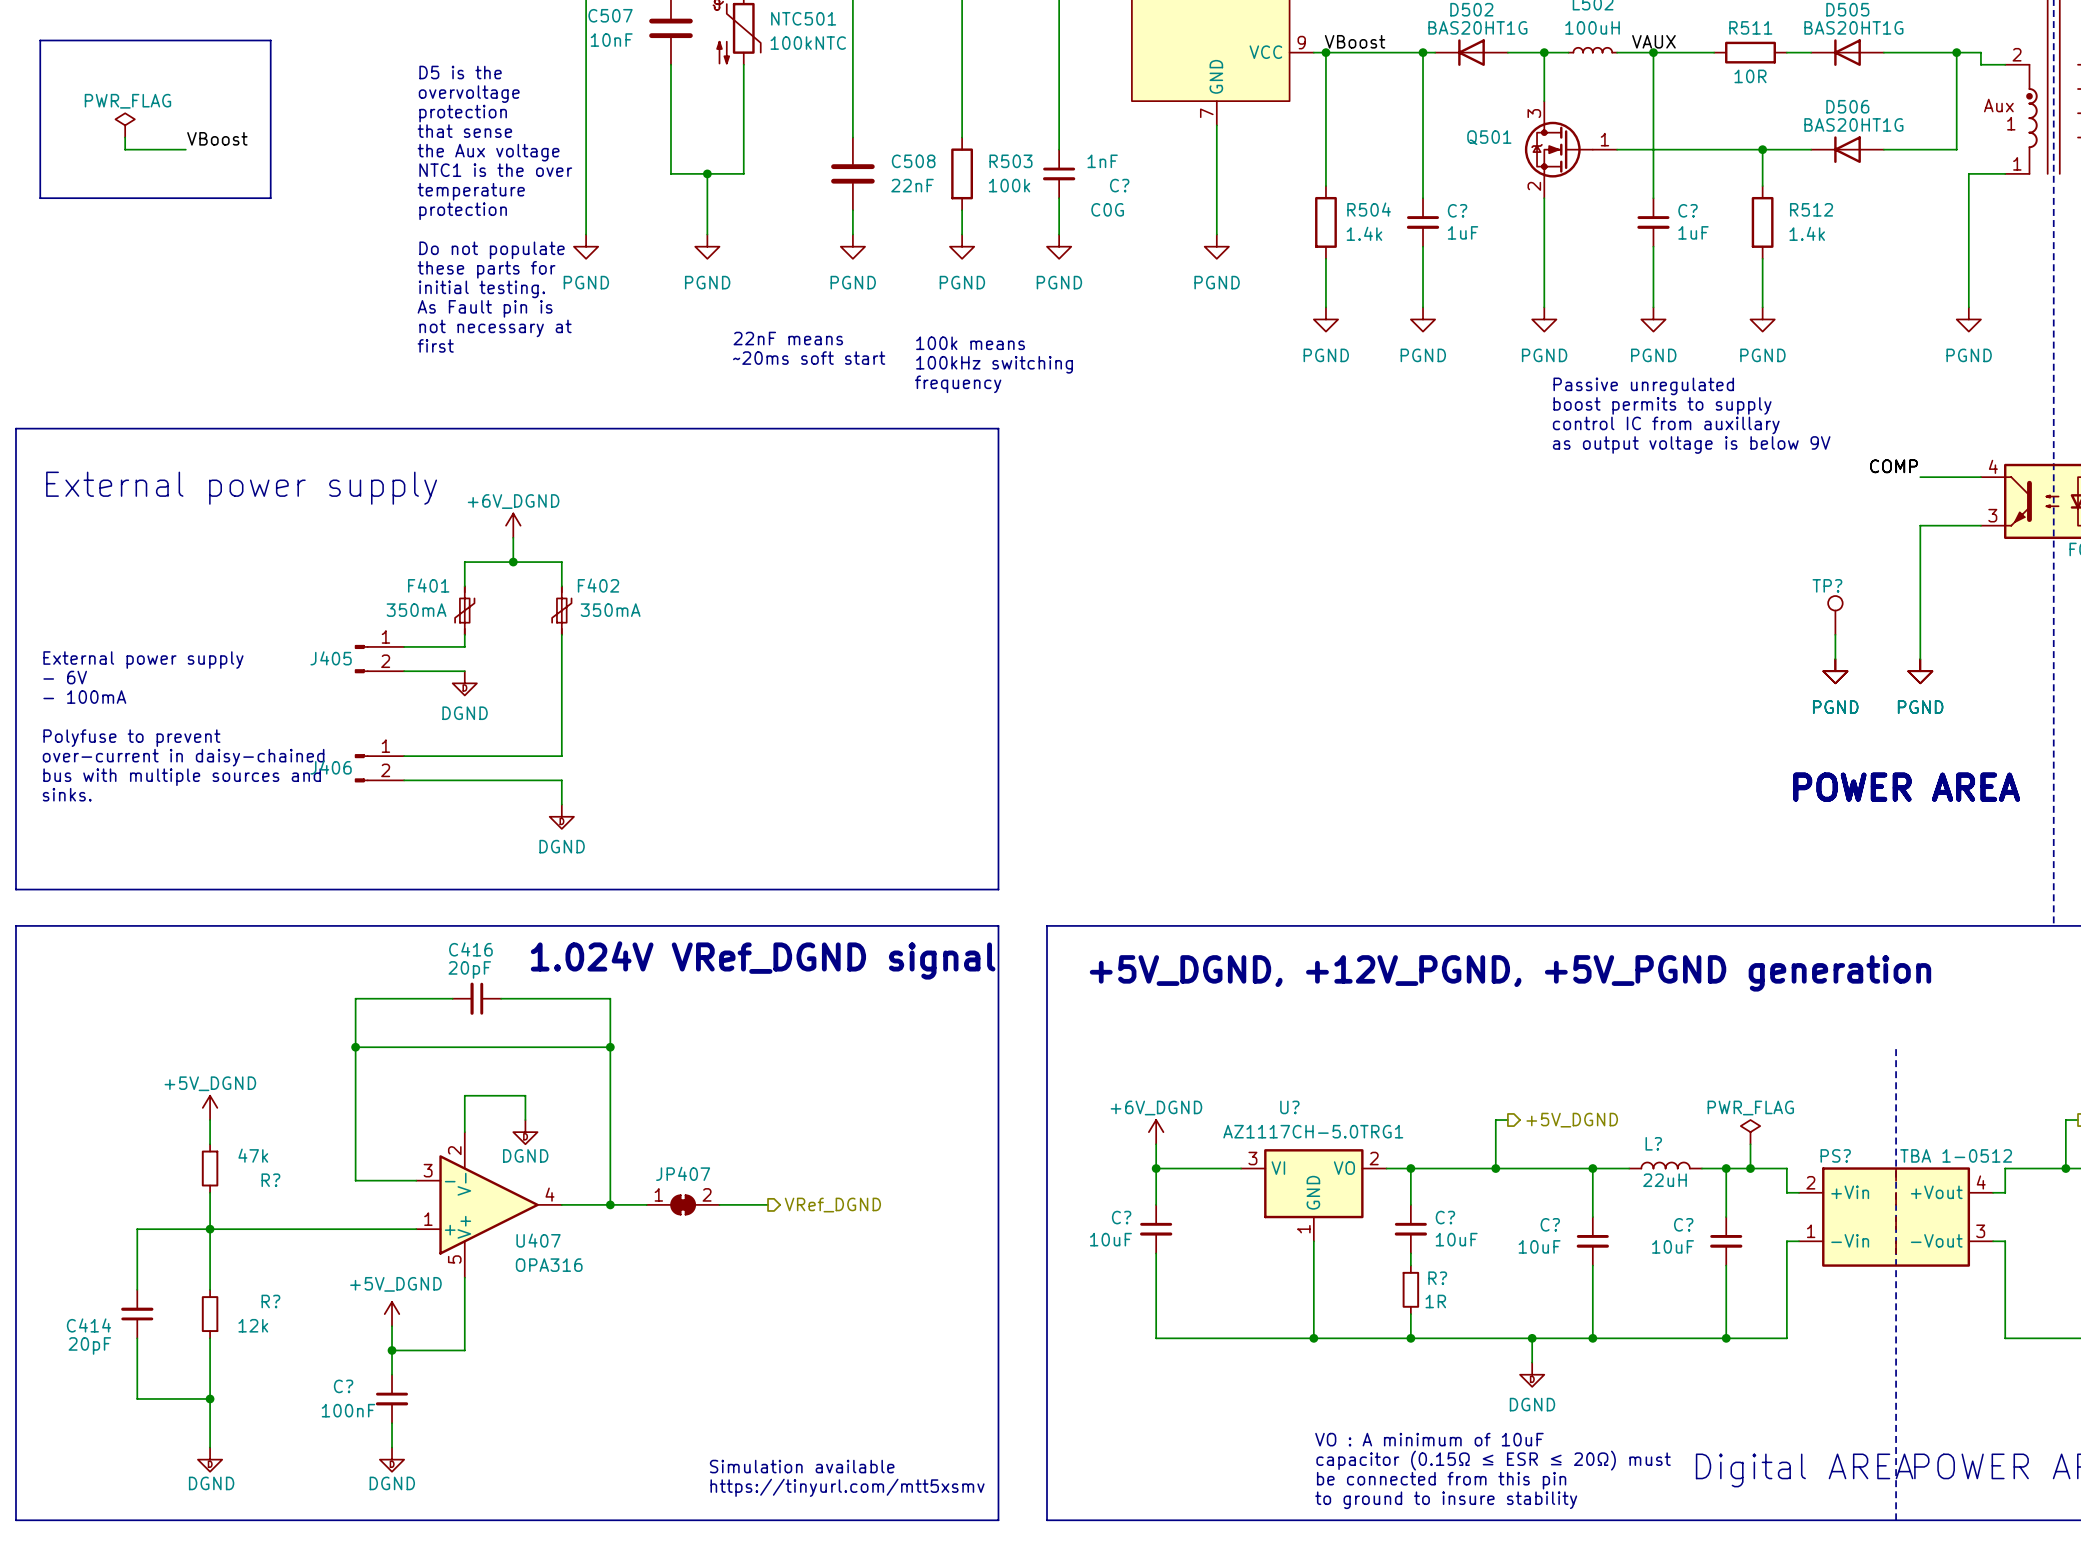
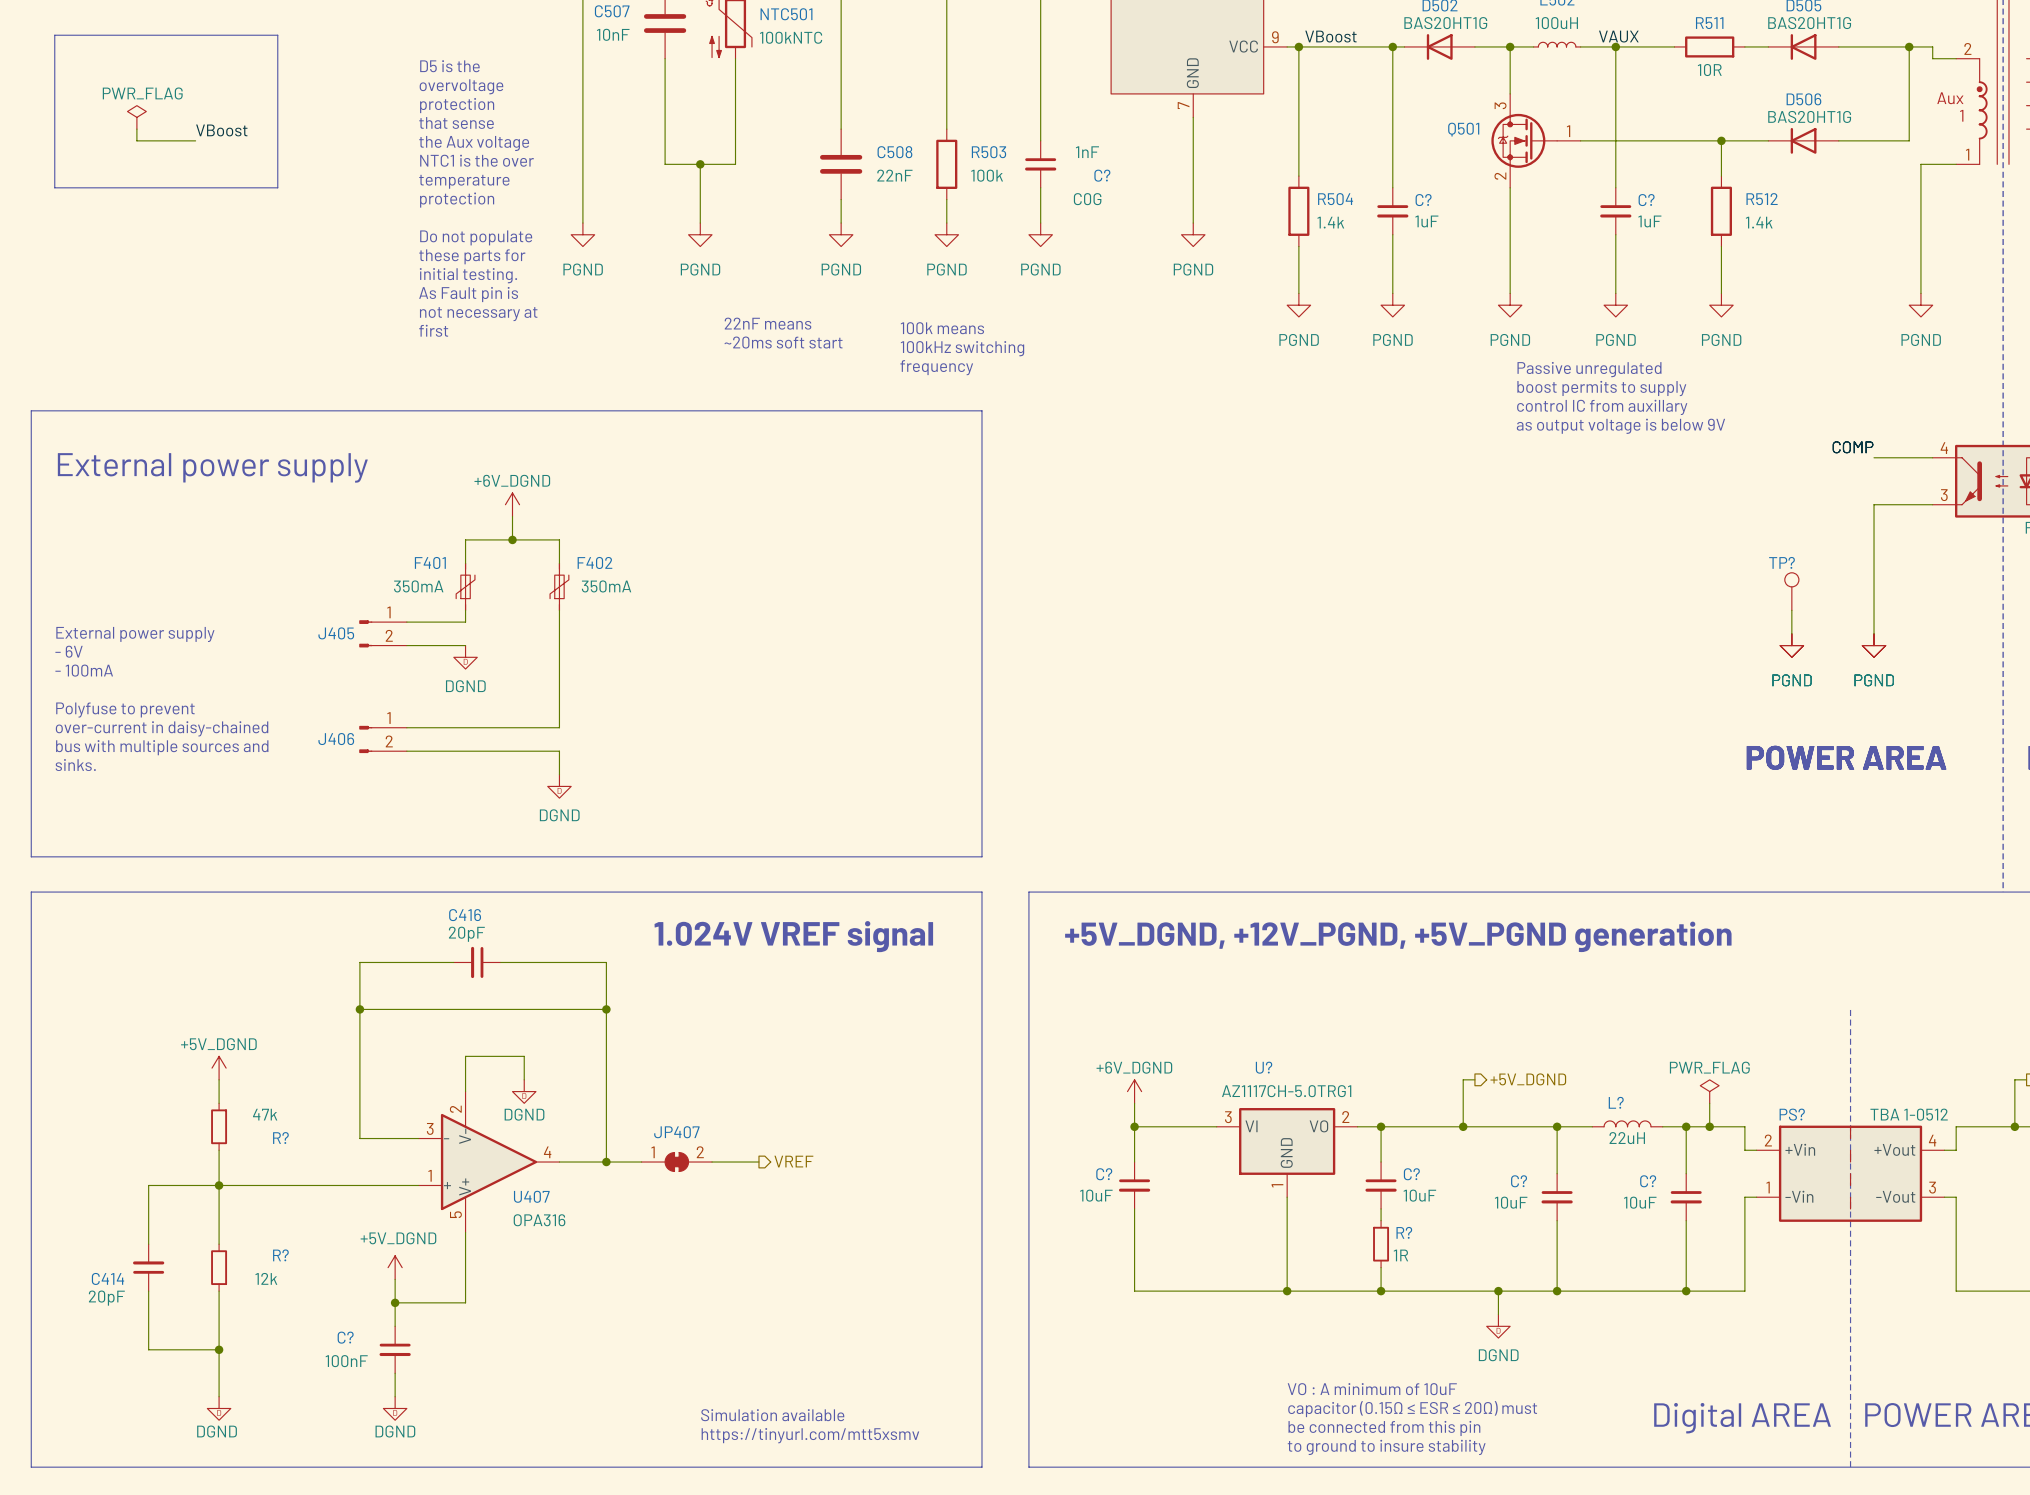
text: 1.024V VRef_DGND signal (763, 960) -> 1.024V VREF signal (793, 936)
hierarchical label: VRef_DGND (832, 1205) -> VREF (793, 1161)

